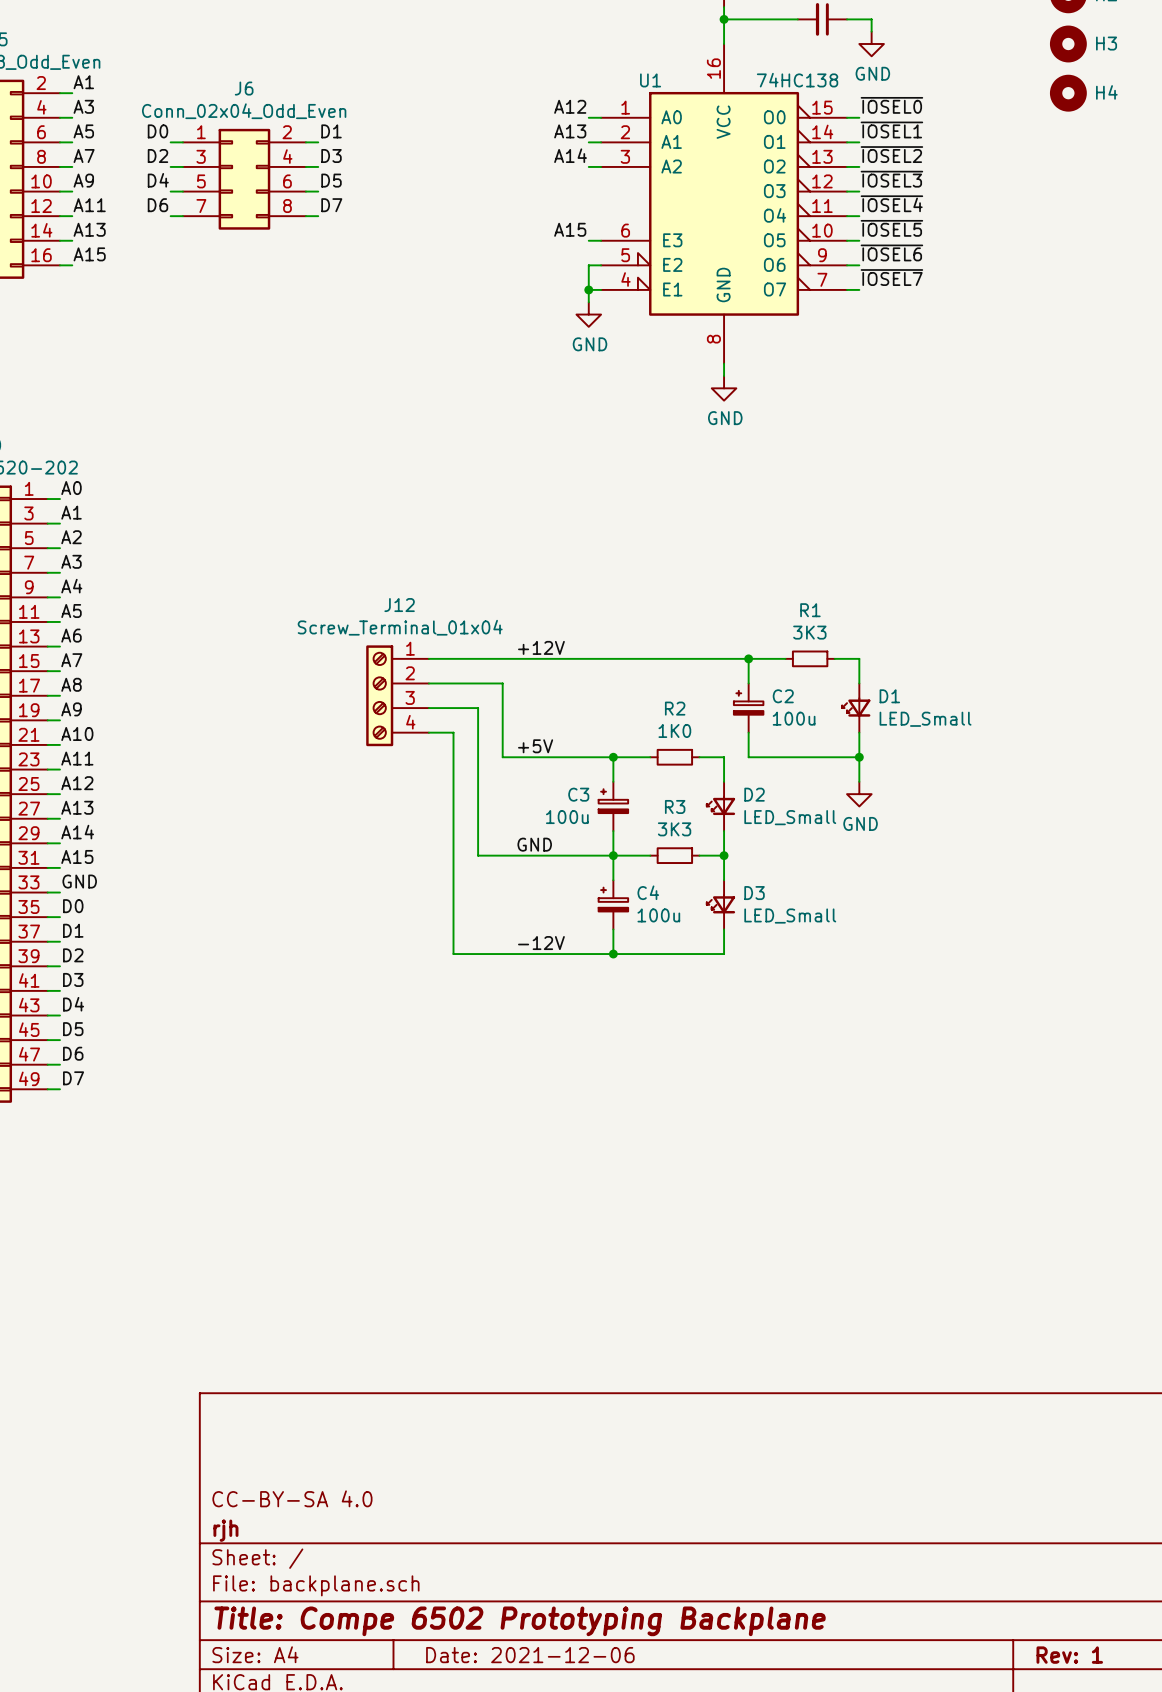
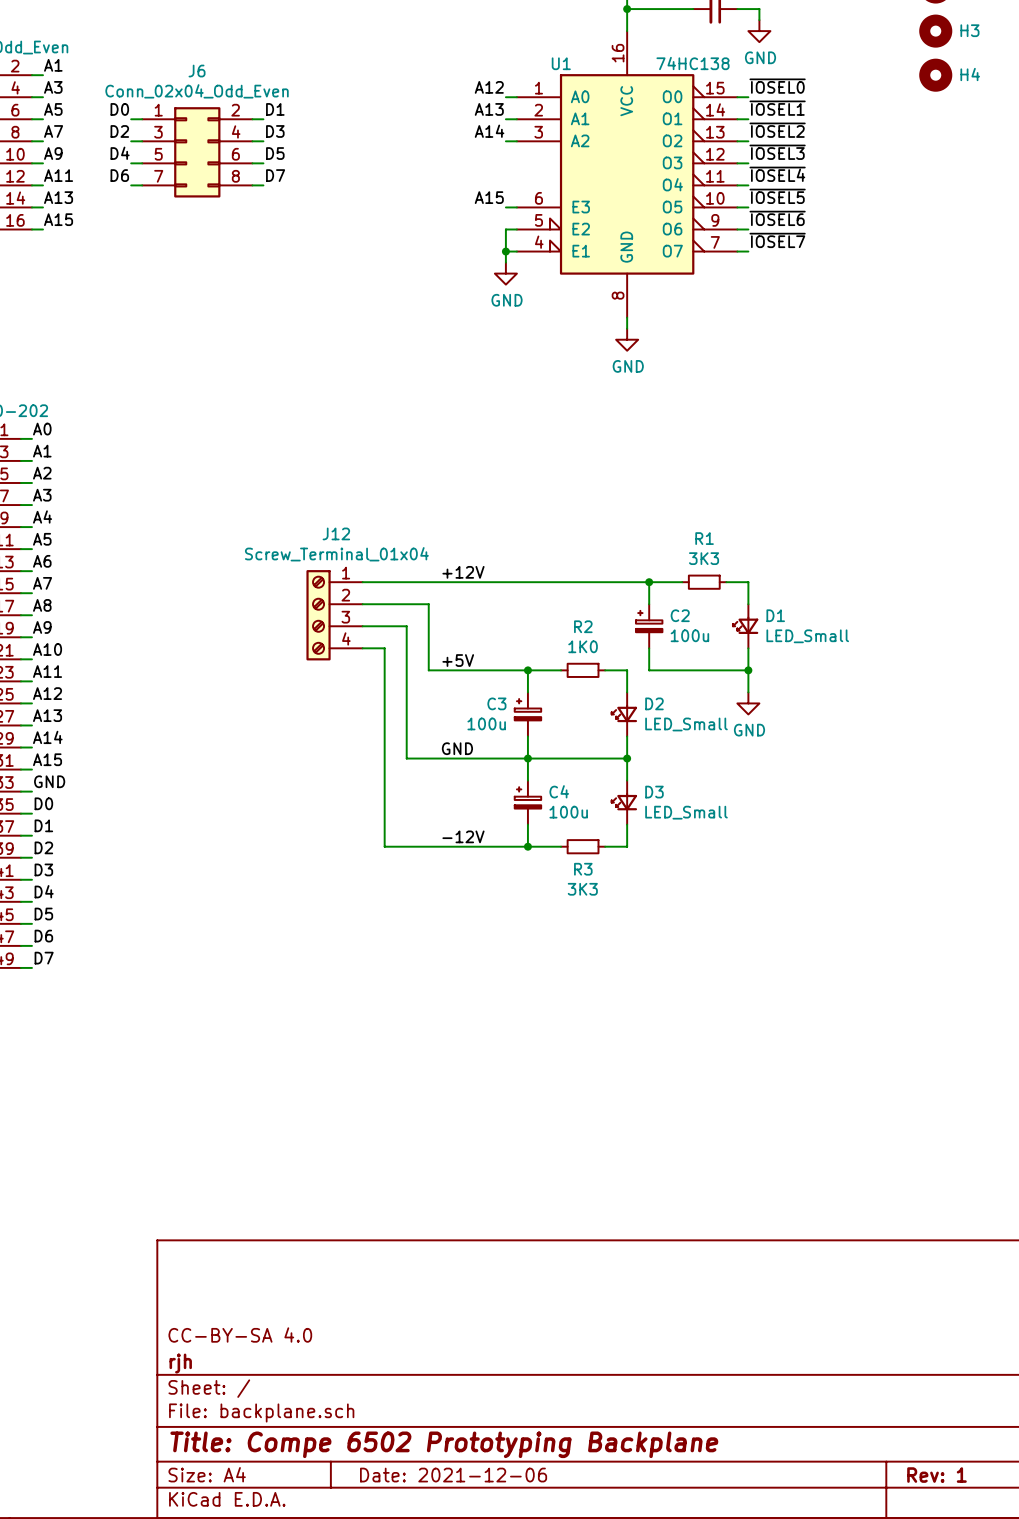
R3 name position: R3 (675, 806) -> R3 (583, 869)
R3 value position: 3K3 (674, 829) -> 3K3 (582, 889)
R3 position: (674, 855) -> (583, 846)
wire: (650, 954) (699, 954) -> (561, 758) (605, 758)

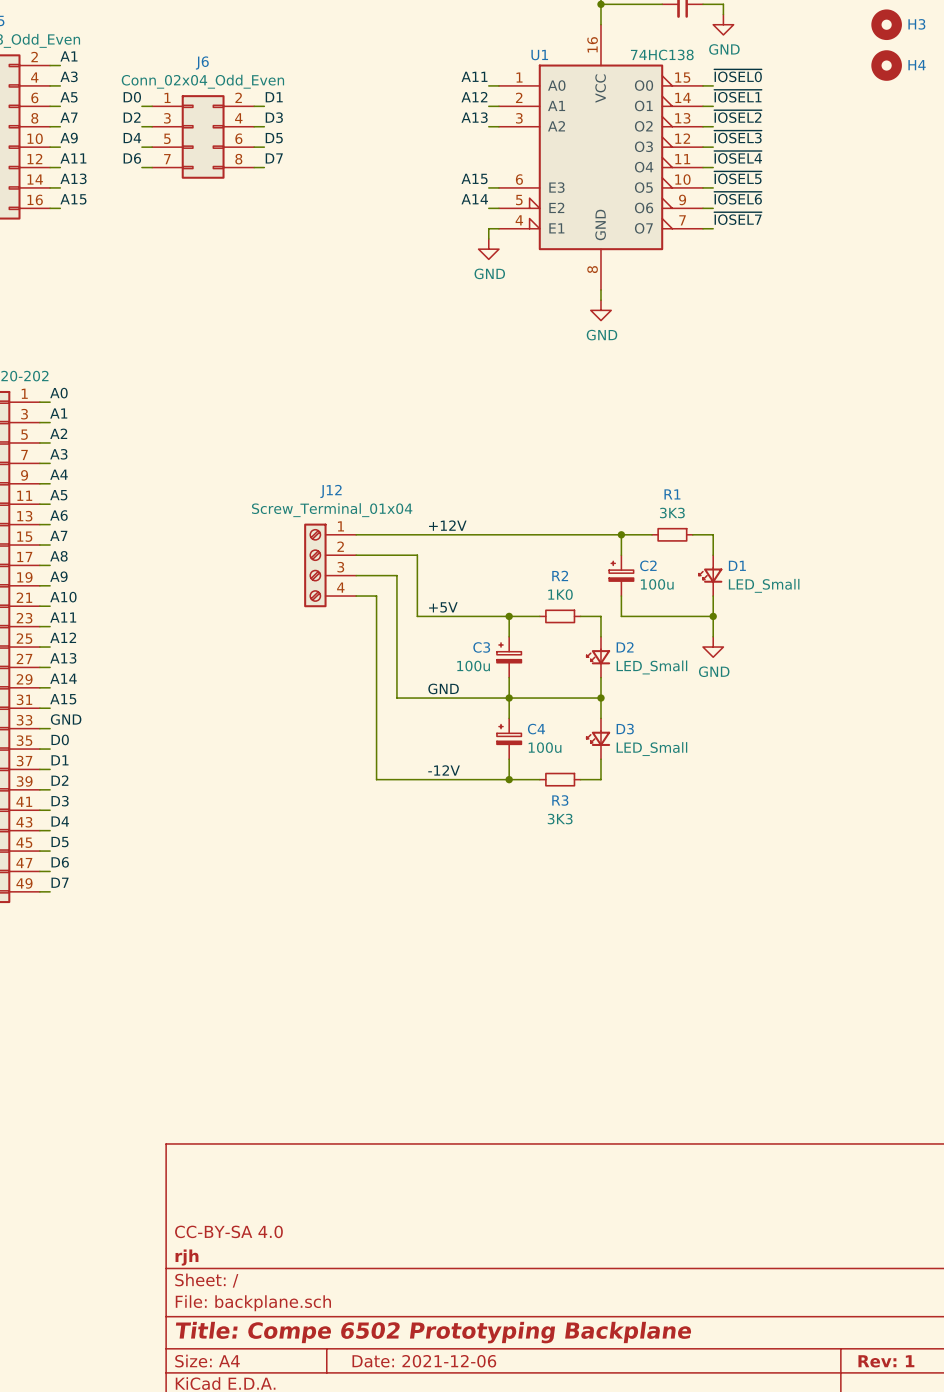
label: A12 (489, 87) -> A11 (474, 76)
label: A13 (489, 109) -> A12 (474, 97)
label: A14 (489, 131) -> A13 (474, 117)
label: none -> A14 (474, 199)
wire: (505, 229) (505, 251) -> none
junction: (505, 251) -> none

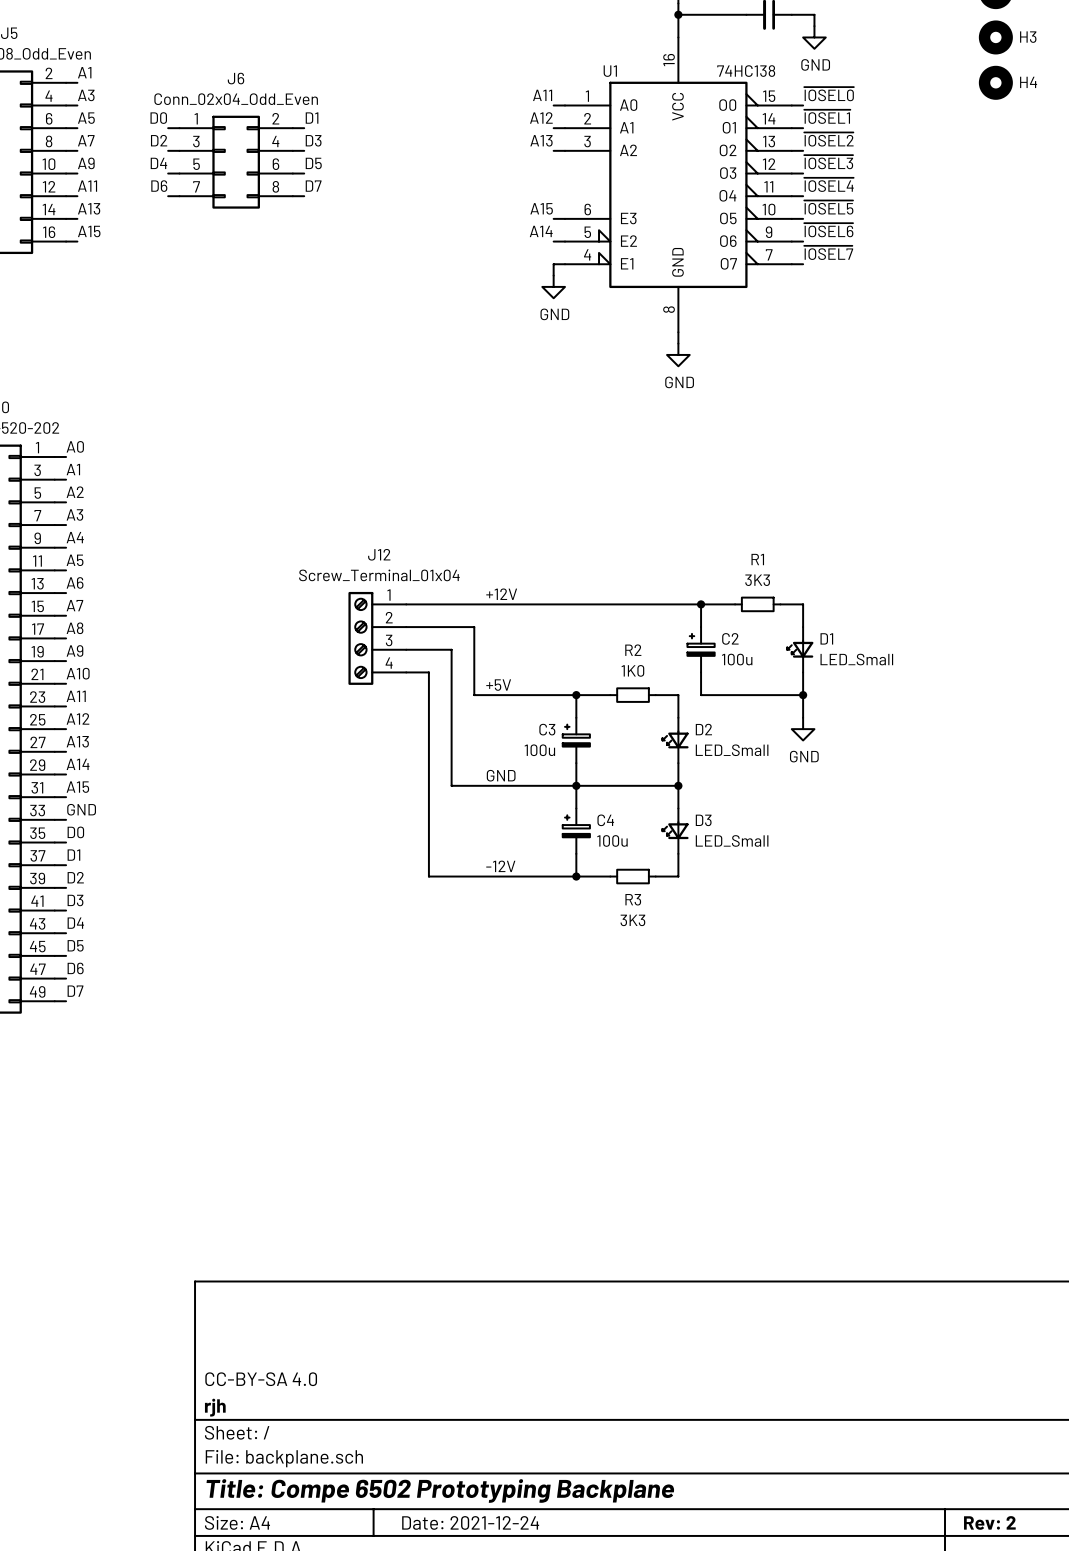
title block: Date: 2021-12-06 (424, 1361) -> Date: 2021-12-24 (470, 1522)
title block: Rev: 1 (886, 1361) -> Rev: 2 (989, 1522)

